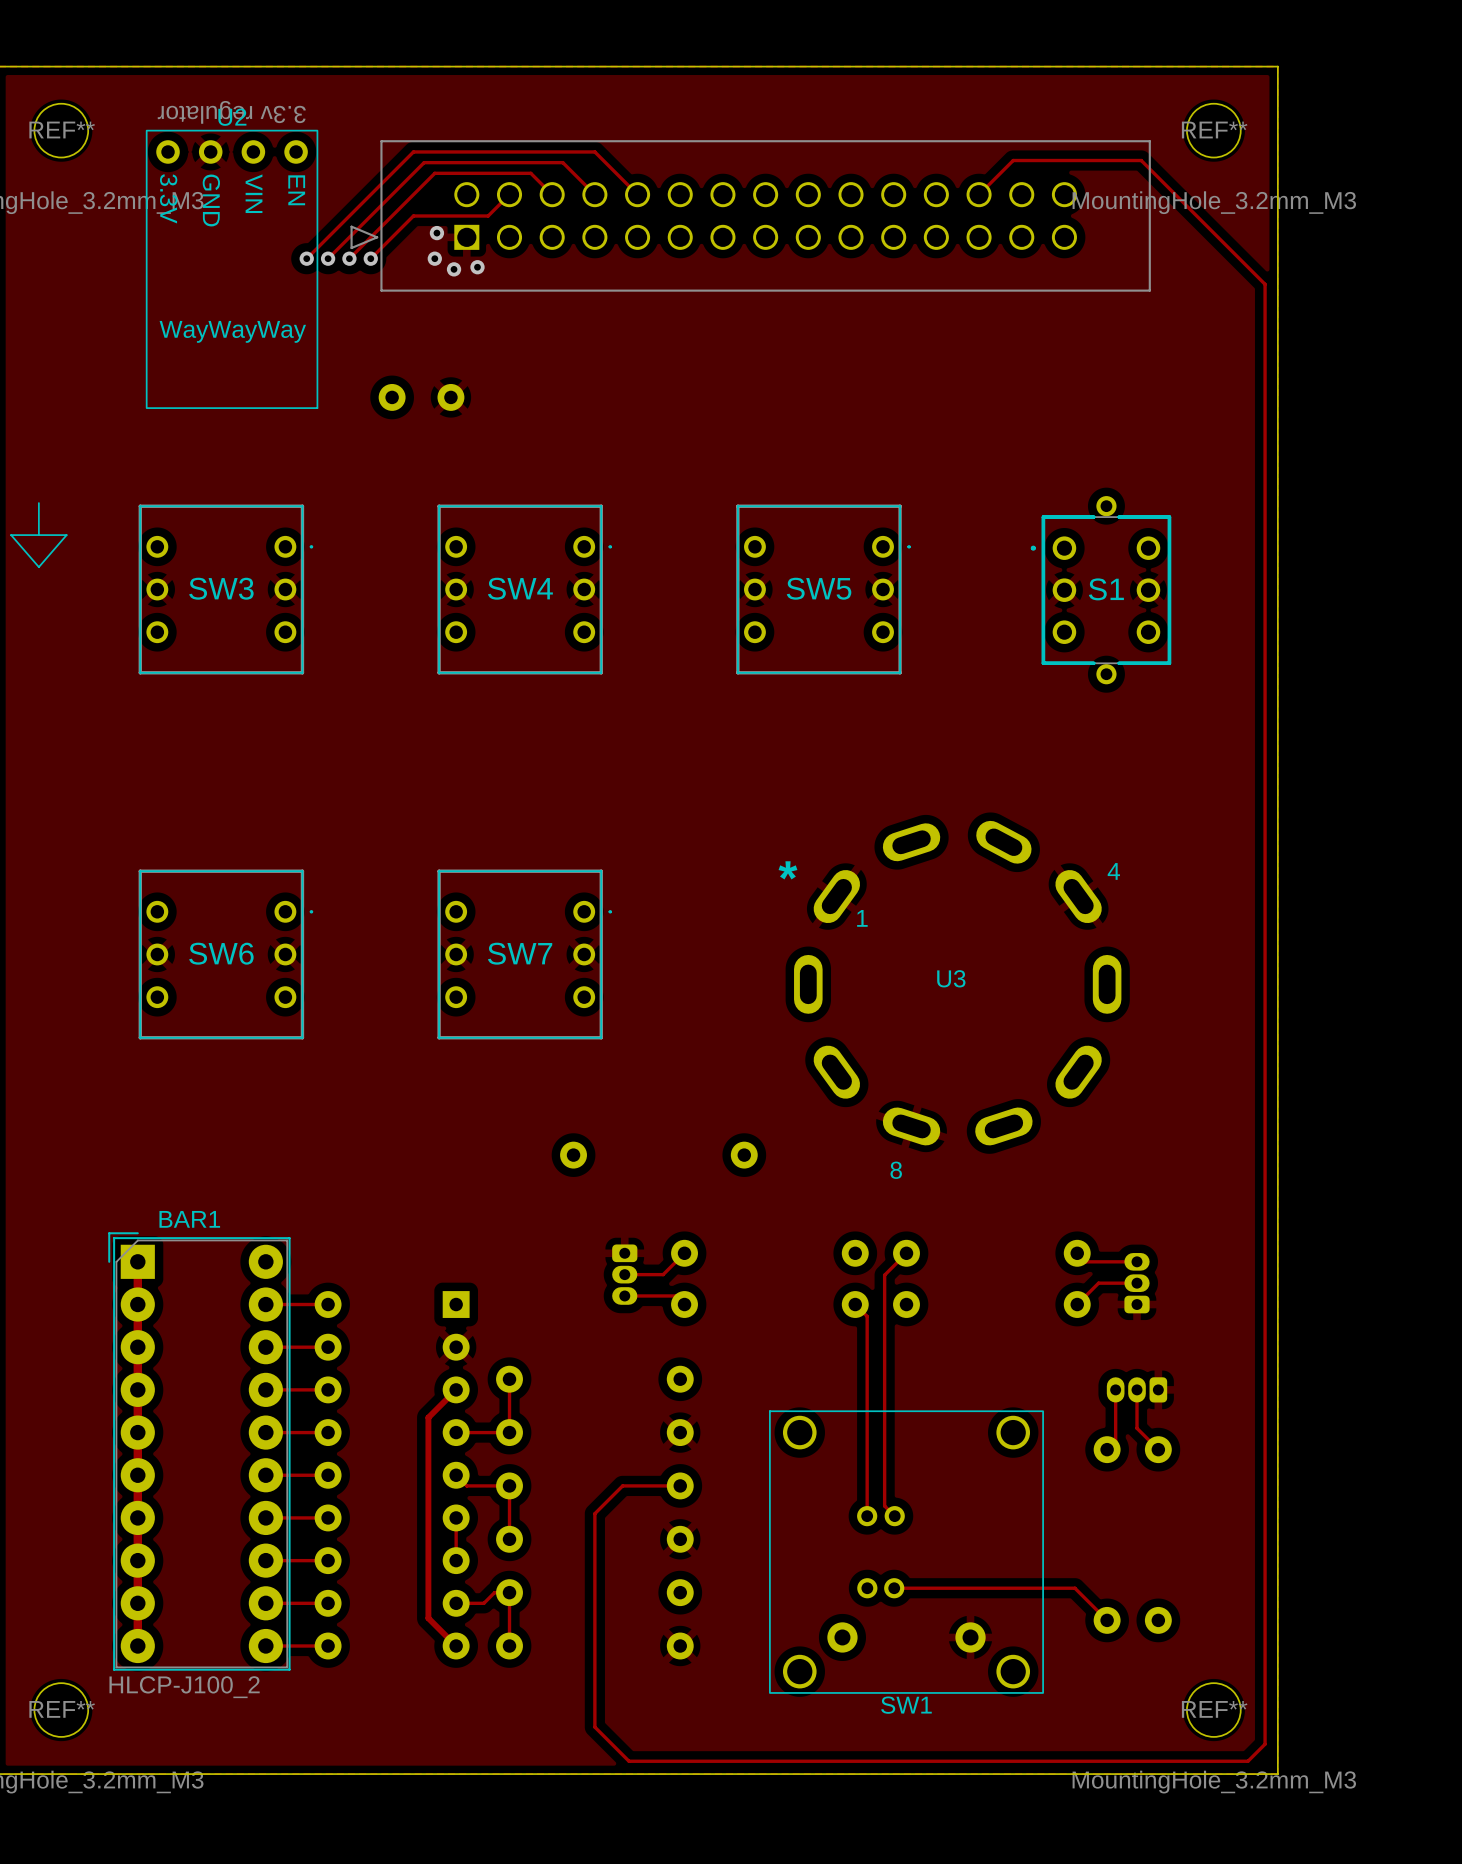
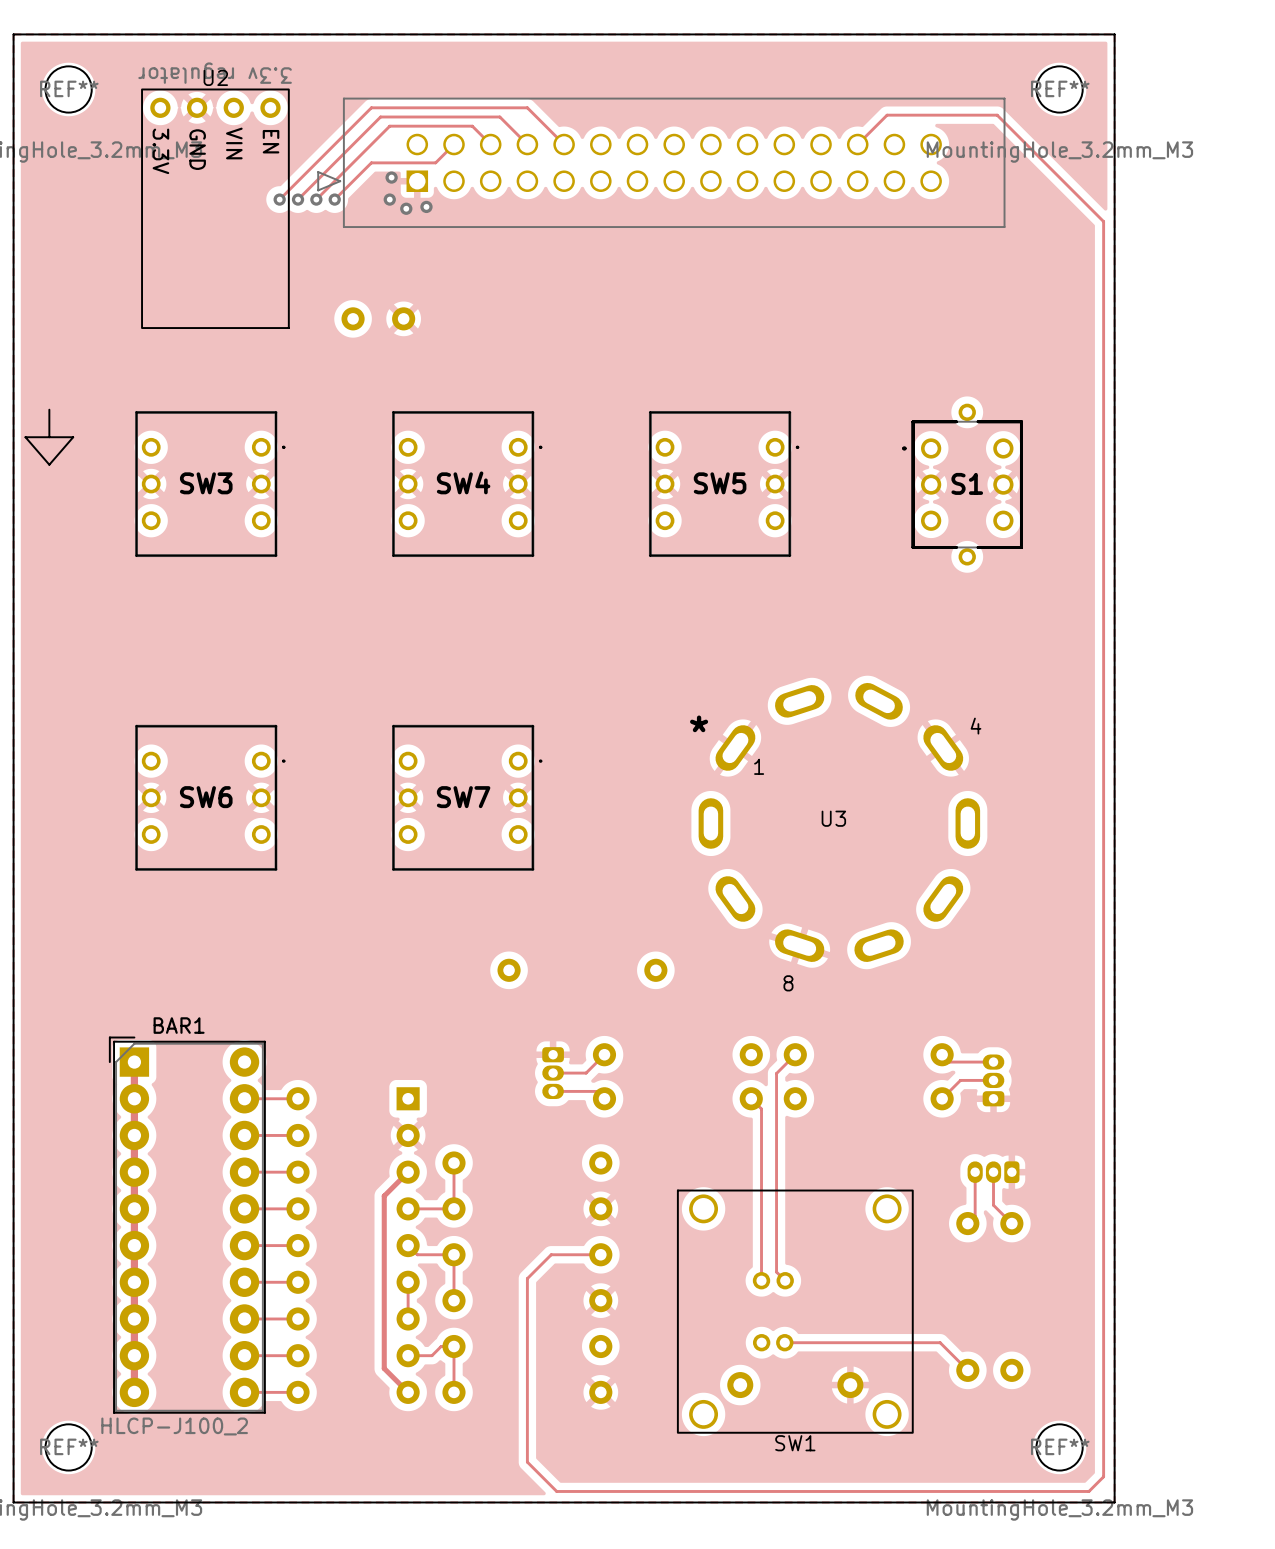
text: WayWayWay (232, 331) -> none

